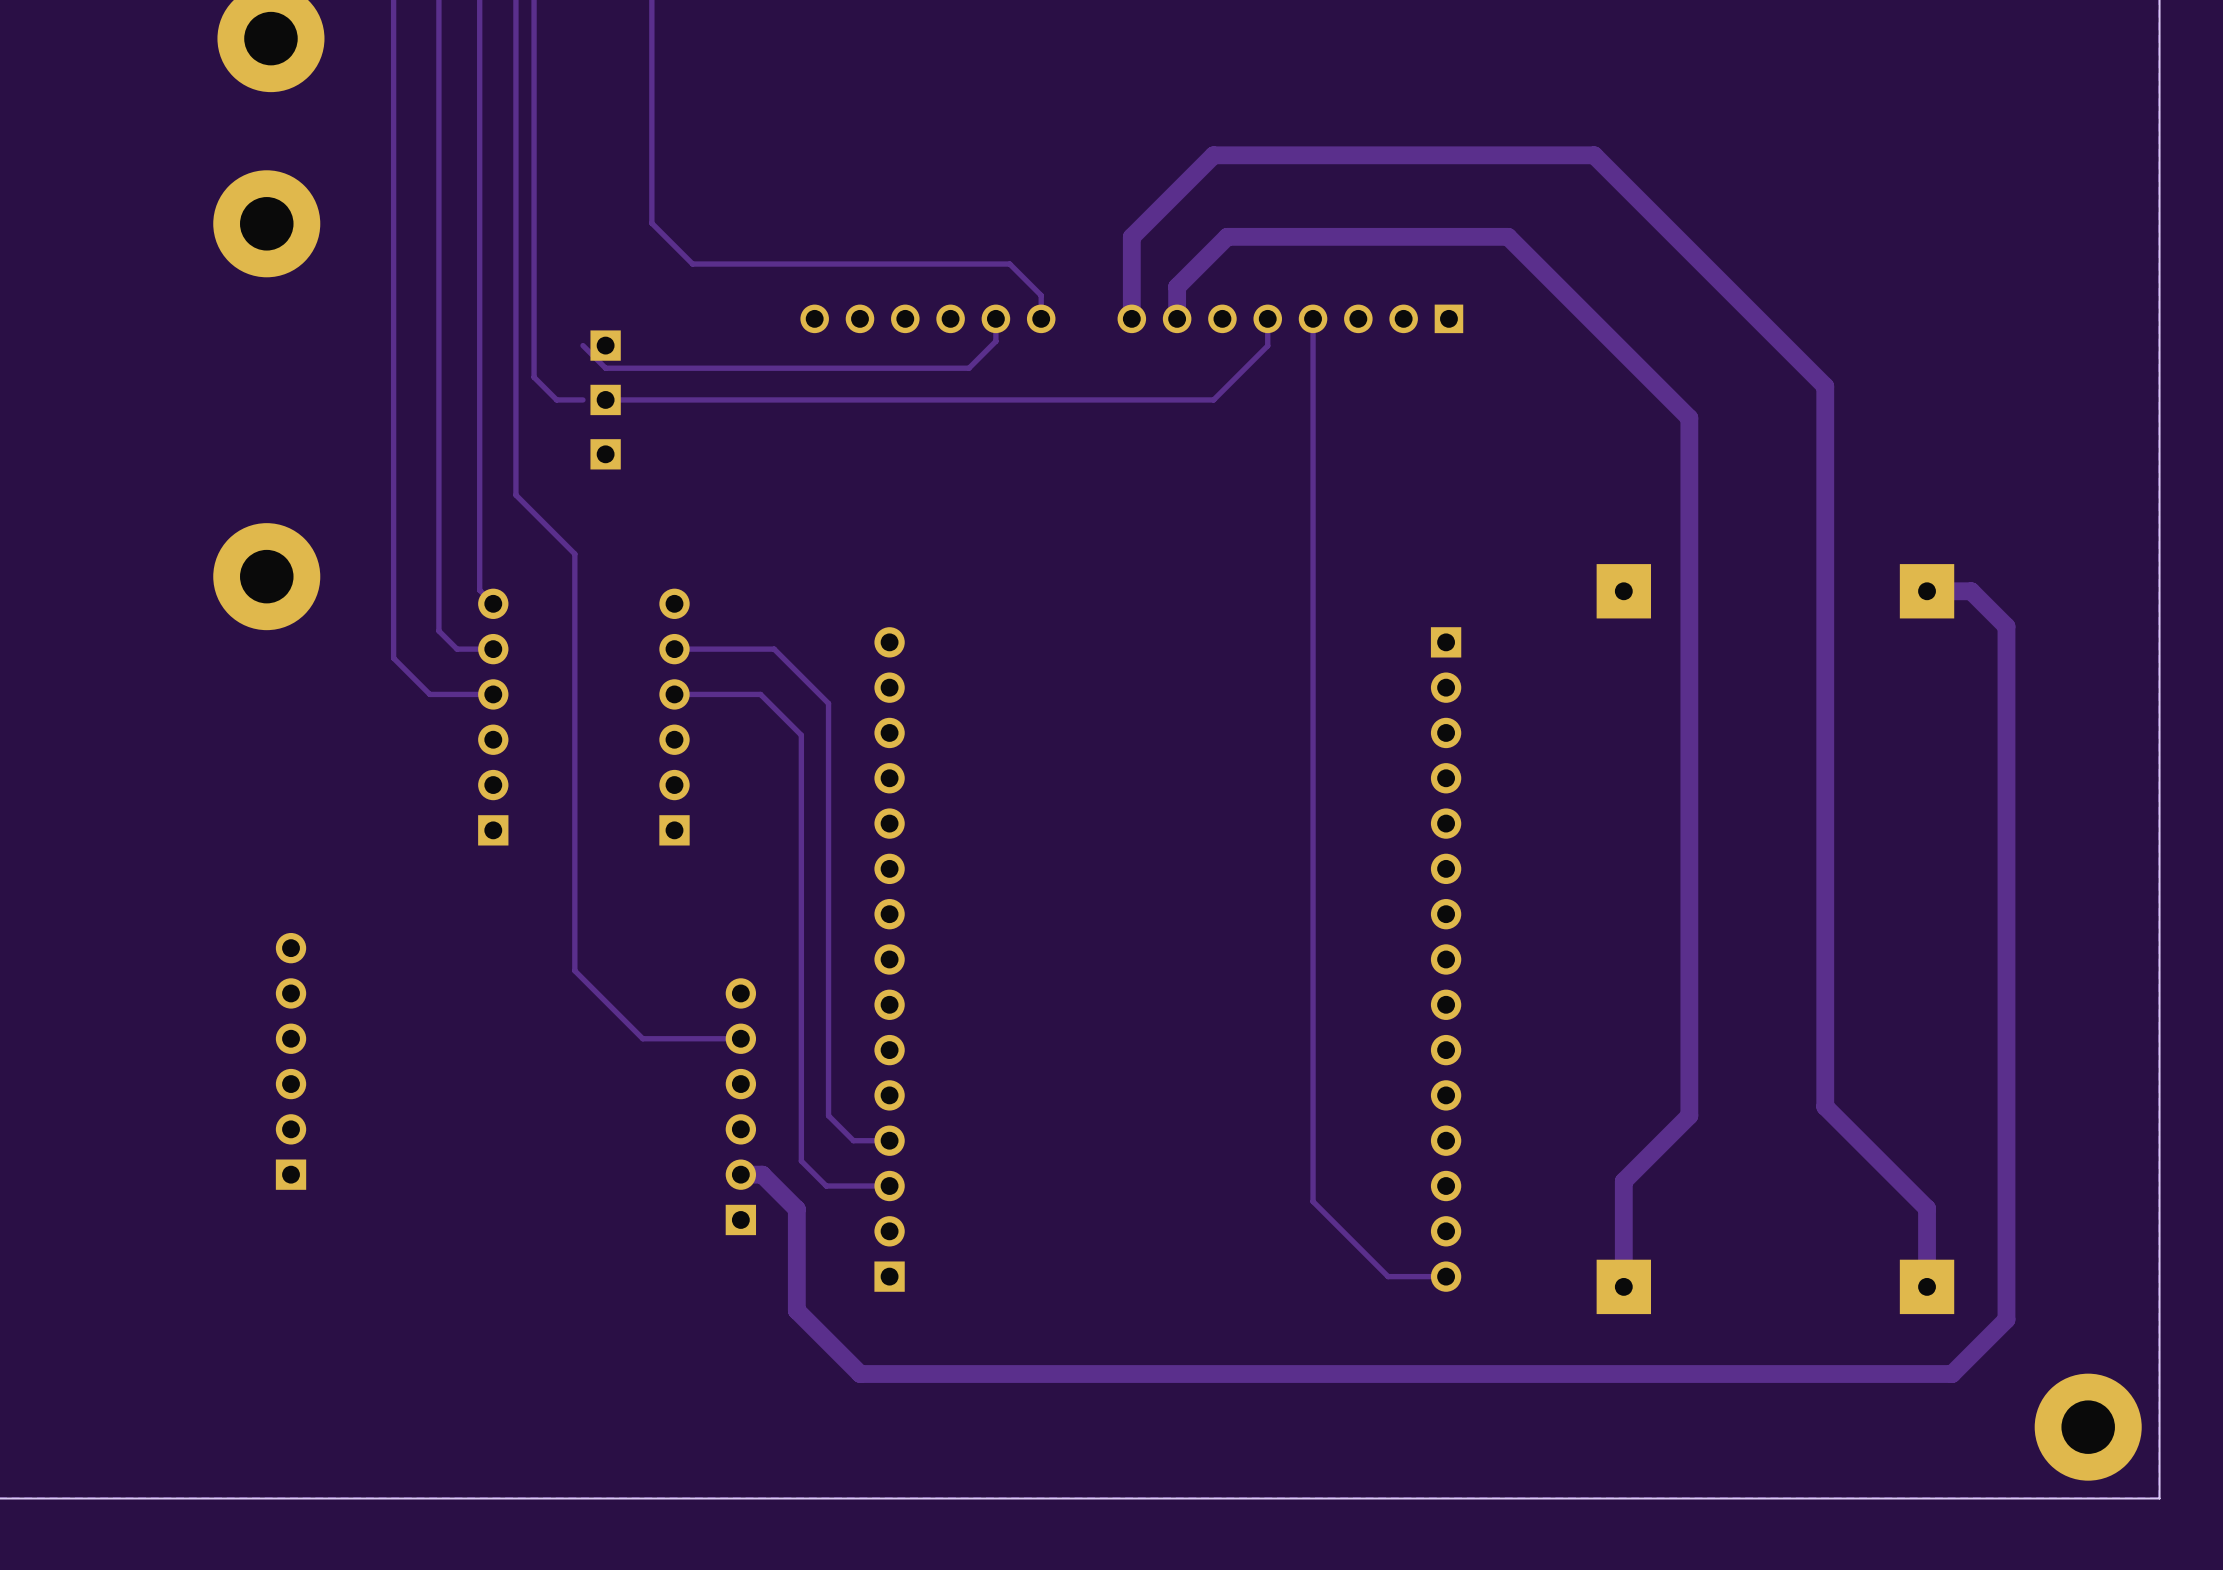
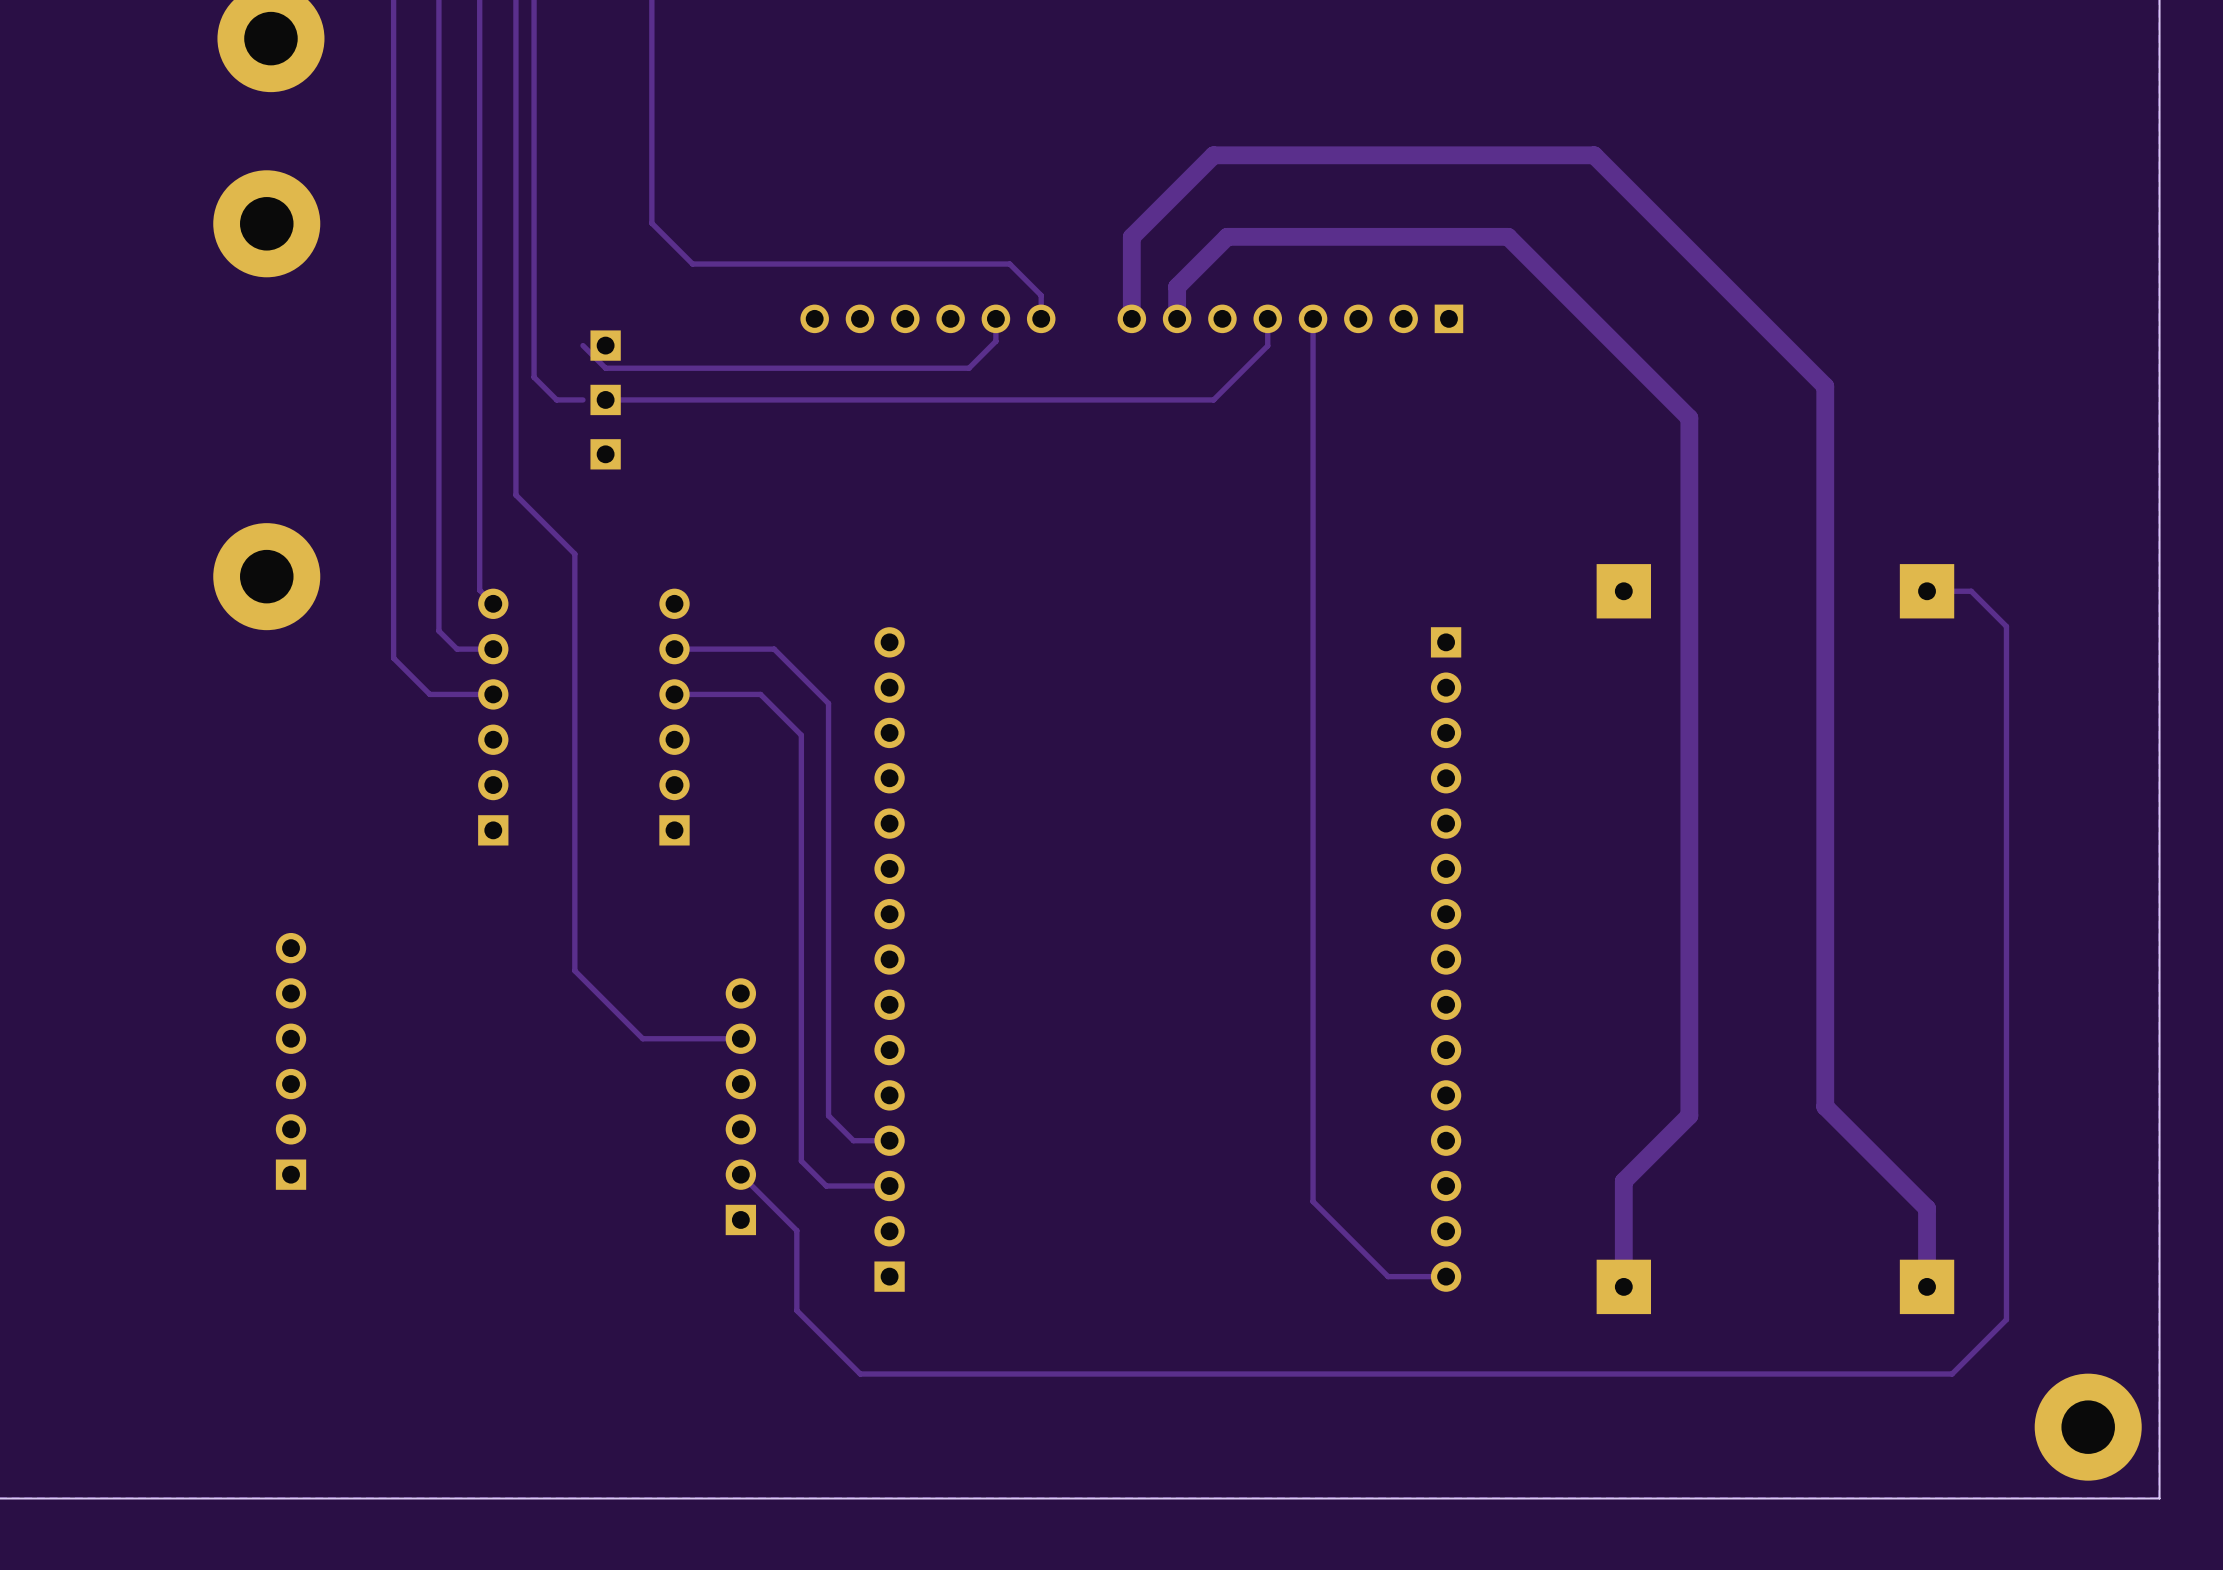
track width: thick (1927, 591) (1971, 591) (2006, 626) (2006, 1319) (1952, 1374) (860, 1374) (796, 1310) (796, 1230) -> thin (1927, 591) (1971, 591) (2006, 626) (2006, 1319) (1952, 1374) (860, 1374) (796, 1310) (796, 1230)
track: (740, 1174) (762, 1174) (796, 1209) (796, 1230) -> (740, 1174) (796, 1230)

